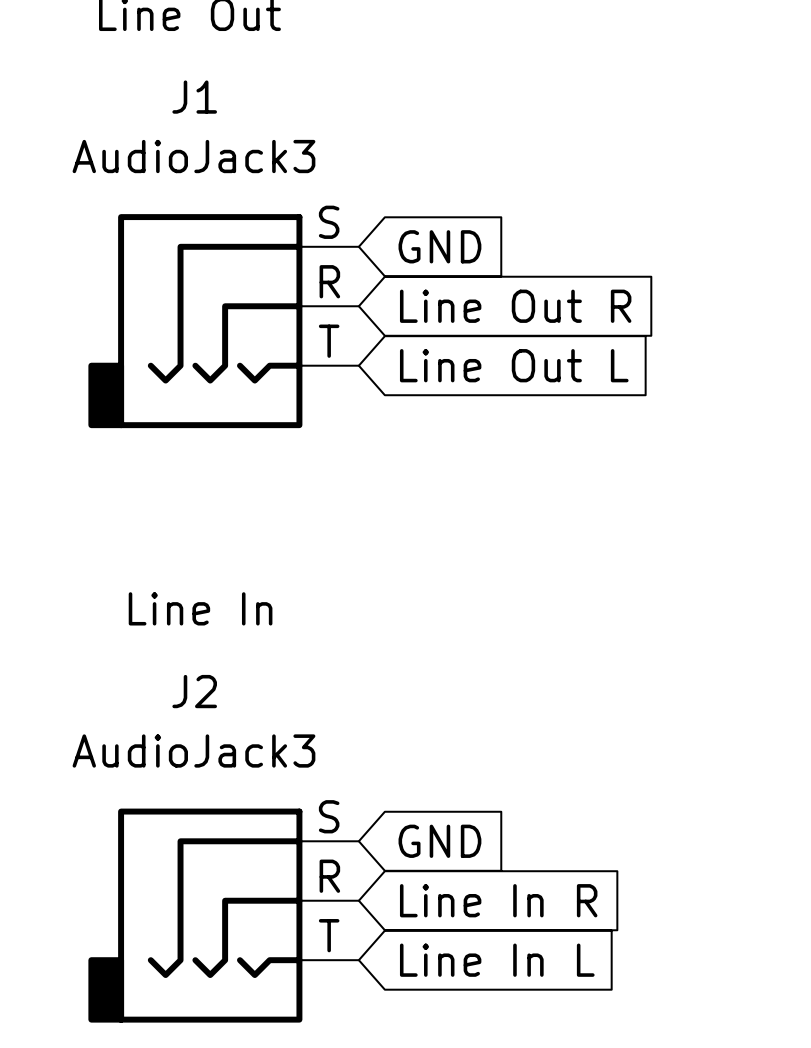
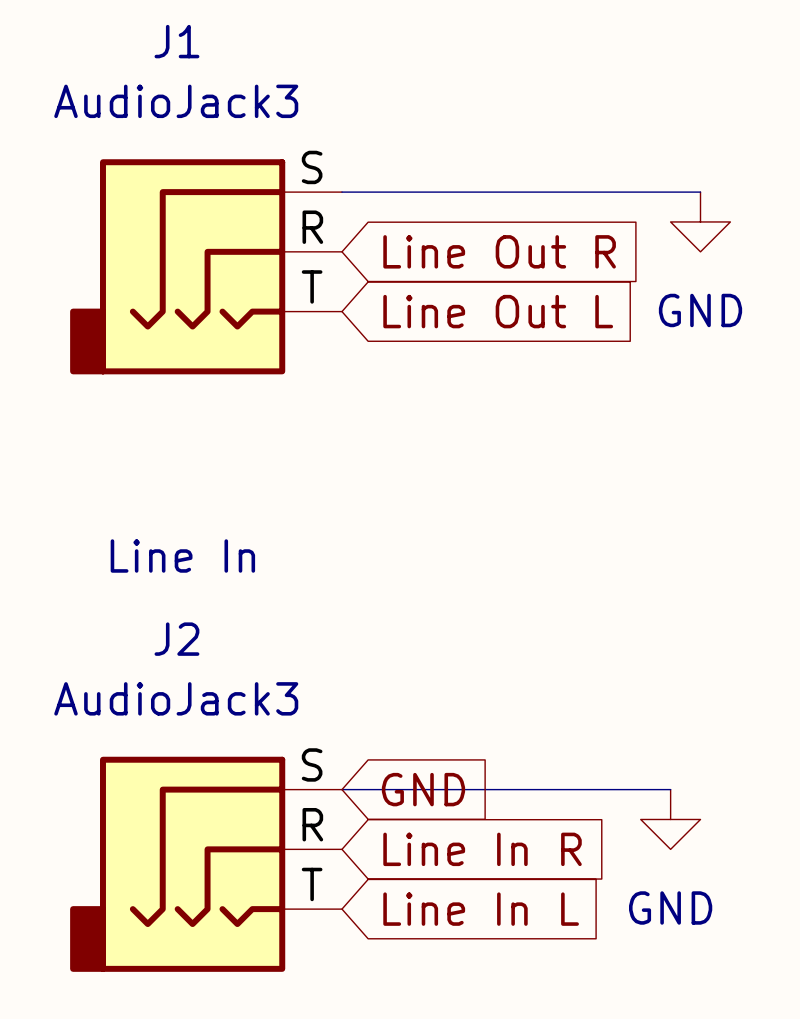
wire: none -> (341, 192) (700, 192)
global label: GND (439, 246) -> none
power symbol: none -> GND (700, 221)
wire: none -> (341, 789) (670, 789)
power symbol: none -> GND (670, 819)

